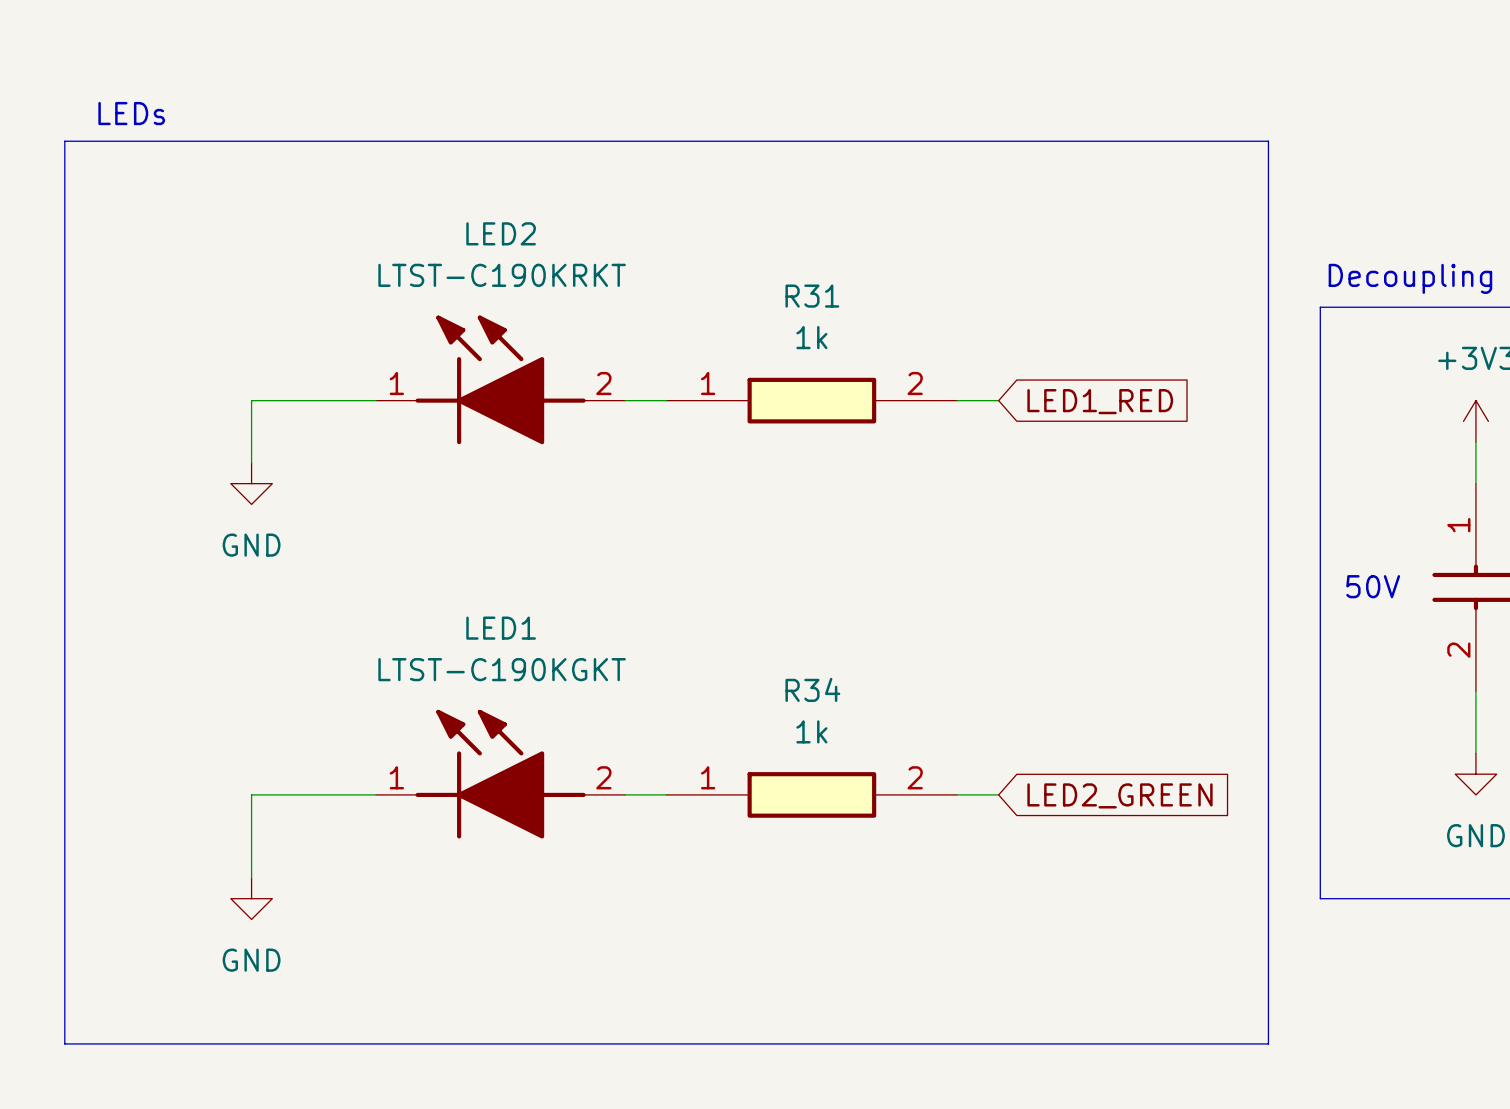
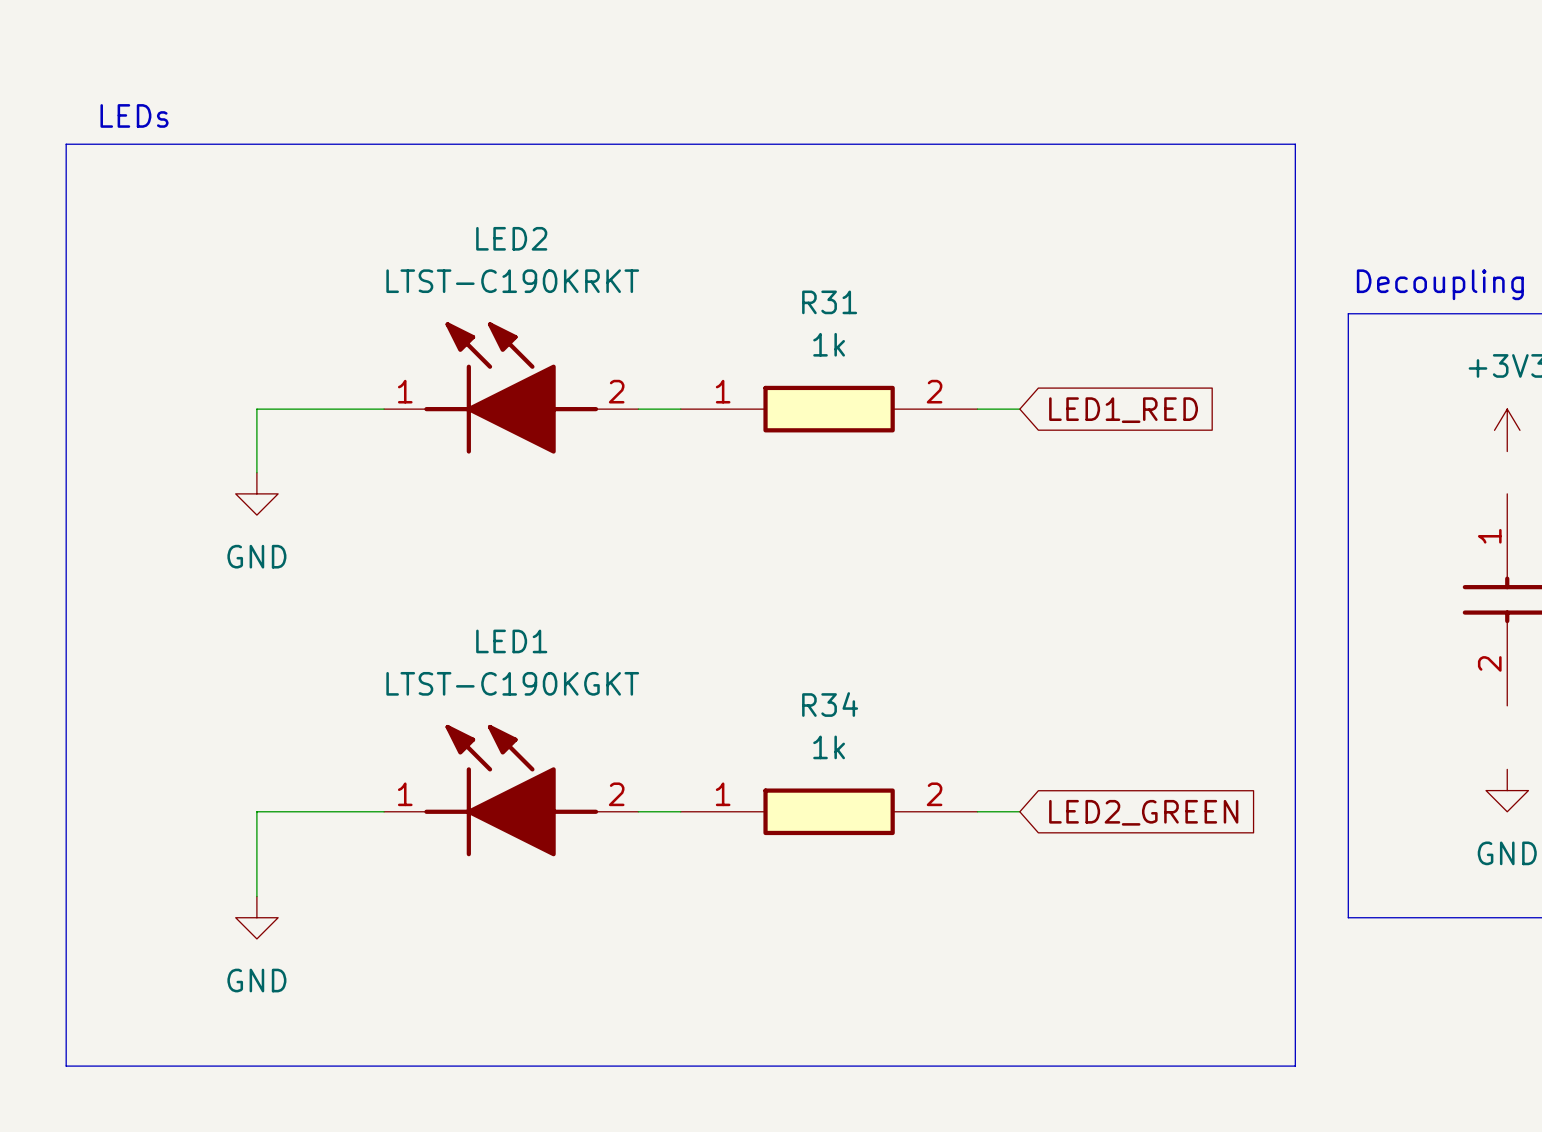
wire: (1475, 442) (1475, 483) -> none
text: 50V (1373, 586) -> none
wire: (1475, 691) (1475, 753) -> none

